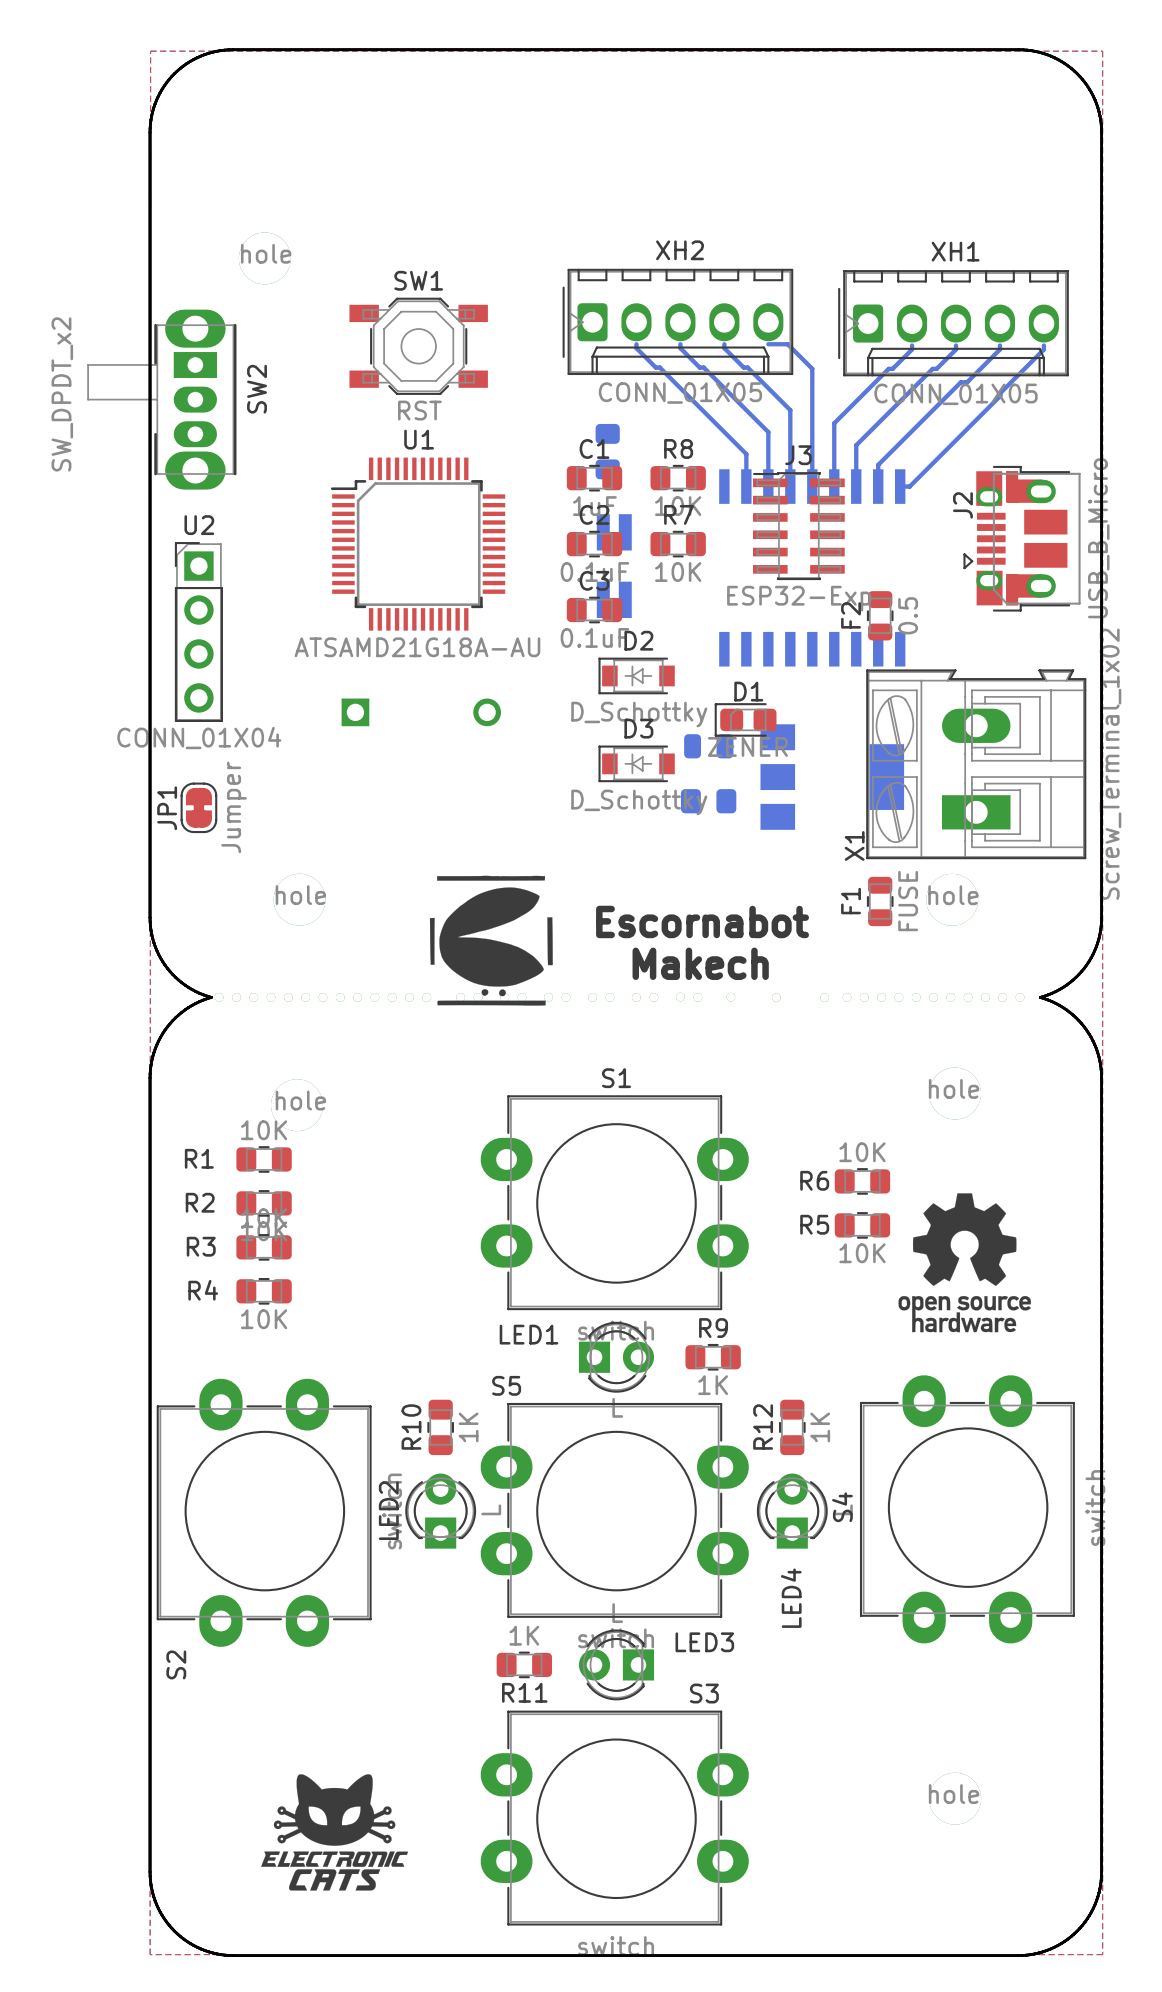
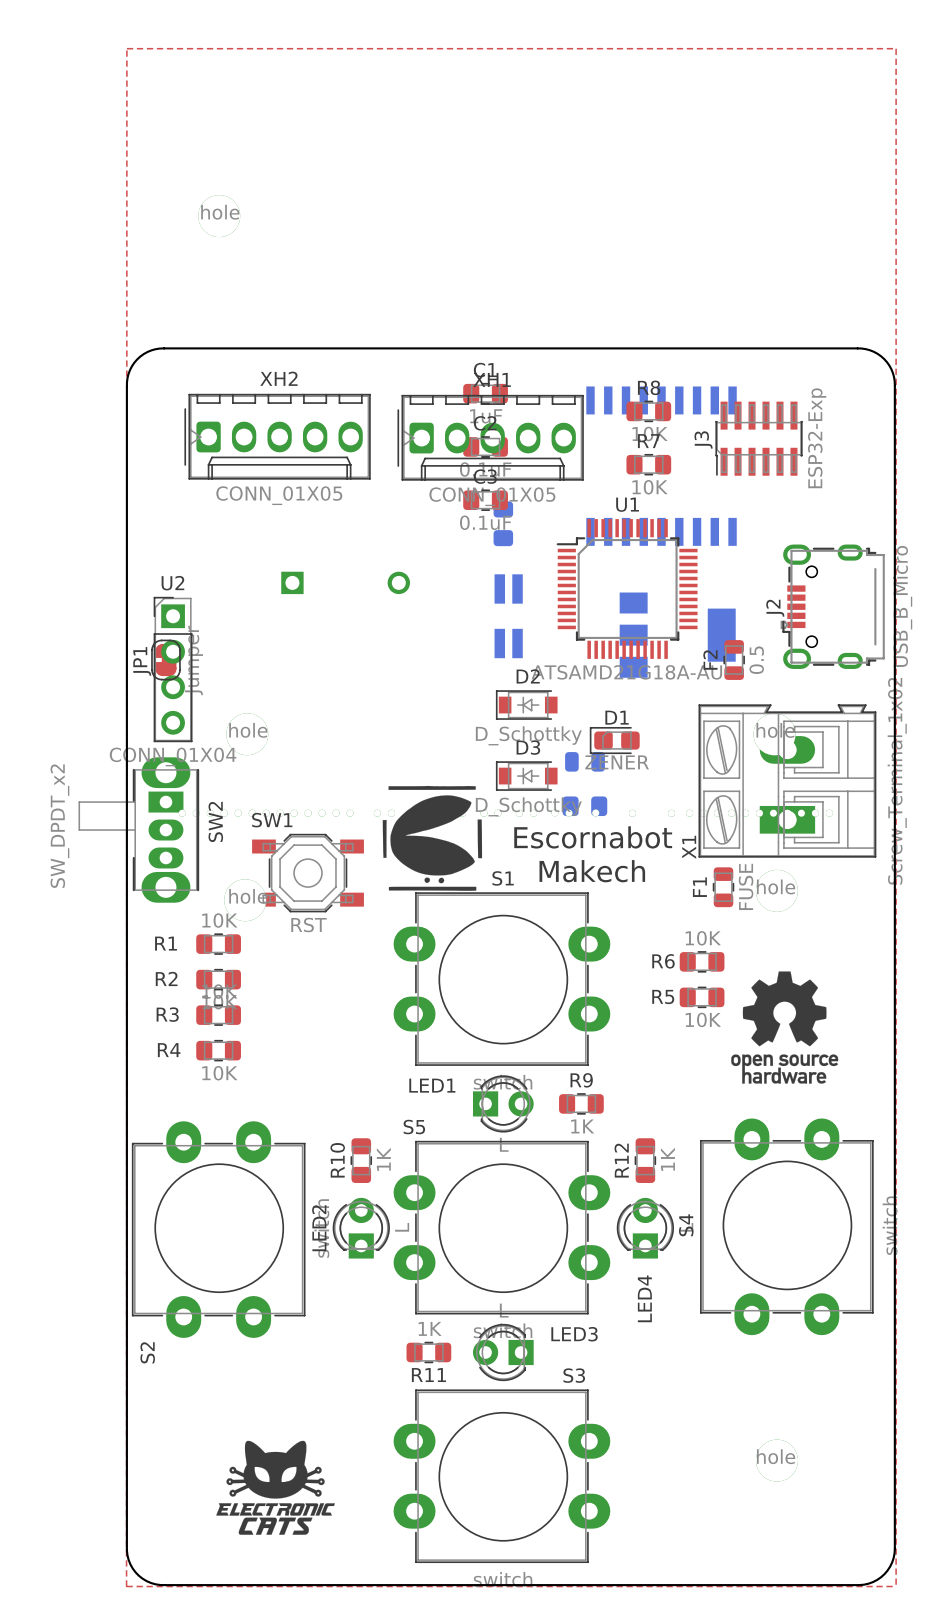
drawing: [148, 48, 1103, 1957] -> none
SW1 name position: SW1 (418, 280) -> SW1 (272, 820)
XH2 position: (677, 321) -> (277, 436)
XH1 position: (953, 323) -> (490, 437)
bottom track: (636, 344) (636, 348) (655, 367) (659, 367) (746, 454) (746, 486) -> none
bottom track: (680, 344) (680, 348) (699, 367) (703, 367) (768, 432) (768, 486) -> none
bottom track: (724, 344) (724, 348) (743, 367) (747, 367) (790, 410) (790, 486) -> none
bottom track: (768, 344) (787, 344) (812, 368) (812, 486) -> none
bottom track: (912, 345) (912, 349) (892, 368) (888, 368) (834, 423) (834, 486) -> none
bottom track: (956, 345) (956, 349) (936, 368) (932, 368) (856, 445) (856, 486) -> none
bottom track: (999, 345) (999, 349) (967, 382) (960, 382) (878, 464) (878, 486) -> none
bottom track: (1043, 345) (1043, 349) (1000, 393) (1000, 395) (909, 486) (900, 486) -> none
SW1 position: (418, 346) -> (308, 873)
SW2 position: (161, 399) -> (138, 830)
board edge: none -> (164, 348) (857, 348) (873, 351) (889, 365) (894, 385) (894, 1548) (890, 1566) (877, 1579) (859, 1585) (165, 1585) (146, 1581) (132, 1568) (126, 1550) (126, 382) (130, 369) (137, 359) (147, 351) (164, 348)
part: (607, 451) -> none
J2 footprint: [963, 465, 1081, 612] -> [780, 544, 885, 669]
R8 position: (678, 478) -> (648, 411)
J2 name position: J2 (962, 505) -> J2 (775, 608)
J3 rotation: 0° (798, 526) -> 90° counterclockwise (759, 438)
J3 position: (798, 526) -> (759, 438)
U1 position: (418, 544) -> (627, 588)
R7 position: (678, 544) -> (648, 464)
part position: (614, 566) -> (508, 616)
F2 position: (880, 615) -> (734, 660)
U2 position: (198, 632) -> (173, 669)
part: none -> (503, 523)
D2 position: (636, 675) -> (526, 705)
D1 position: (745, 719) -> (614, 740)
part position: (708, 746) -> (585, 761)
D3 position: (636, 763) -> (526, 776)
X1 position: (976, 764) -> (787, 781)
part: (708, 801) -> none
F1 position: (880, 901) -> (723, 887)
text position: Escornabot (702, 921) -> Escornabot (593, 837)
drawing position: (491, 940) -> (432, 838)
text position: Makech (700, 963) -> Makech (592, 871)
part: none -> (584, 806)

